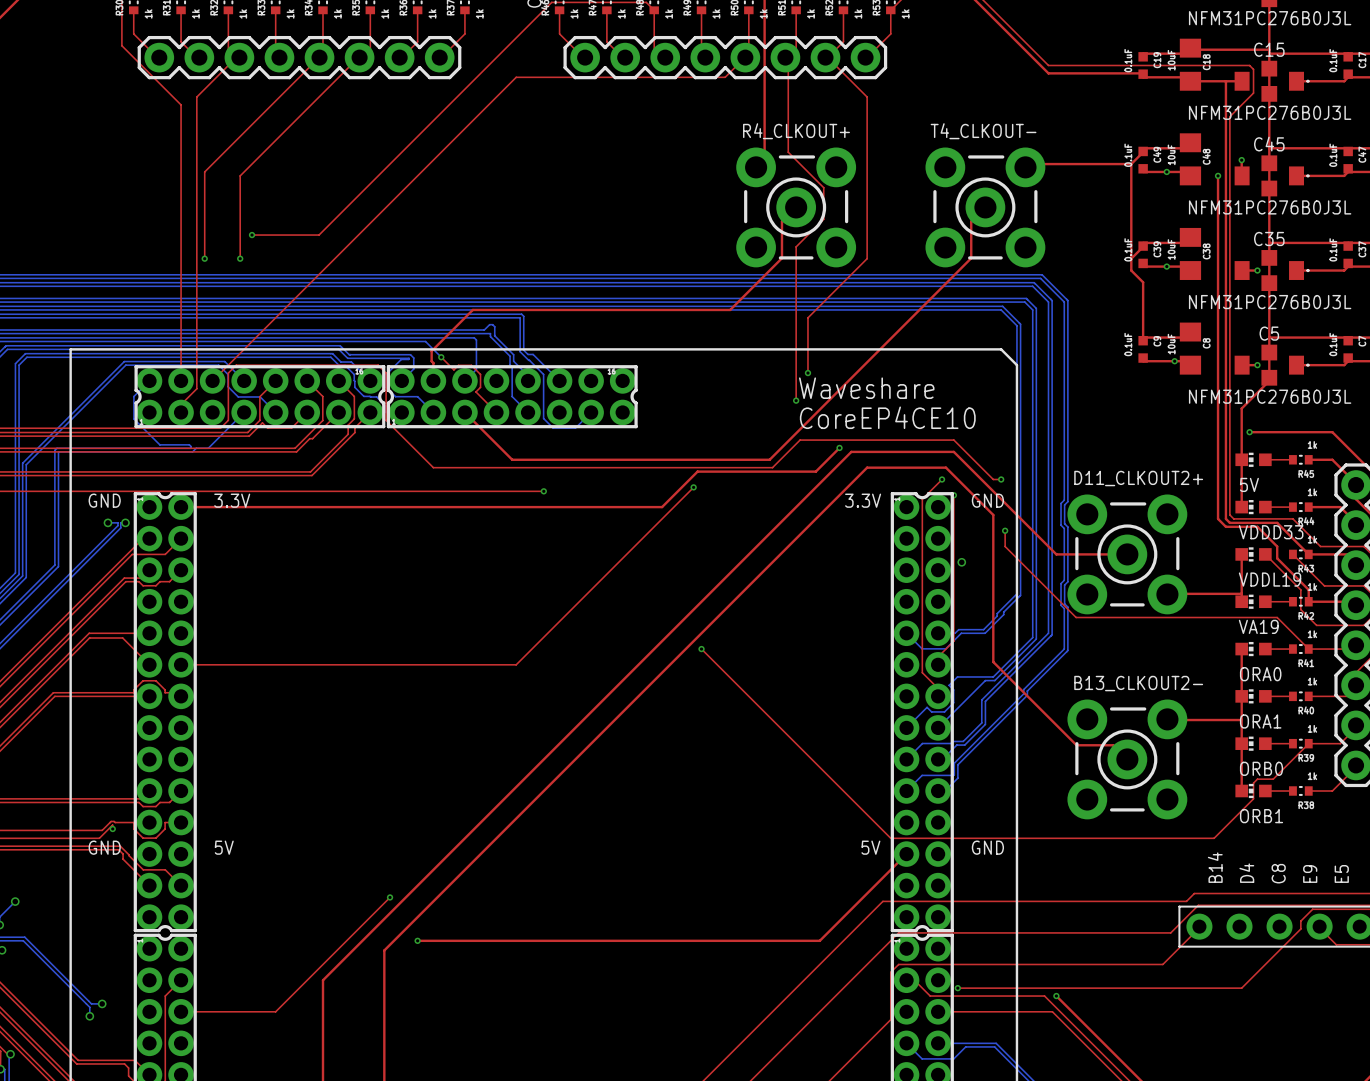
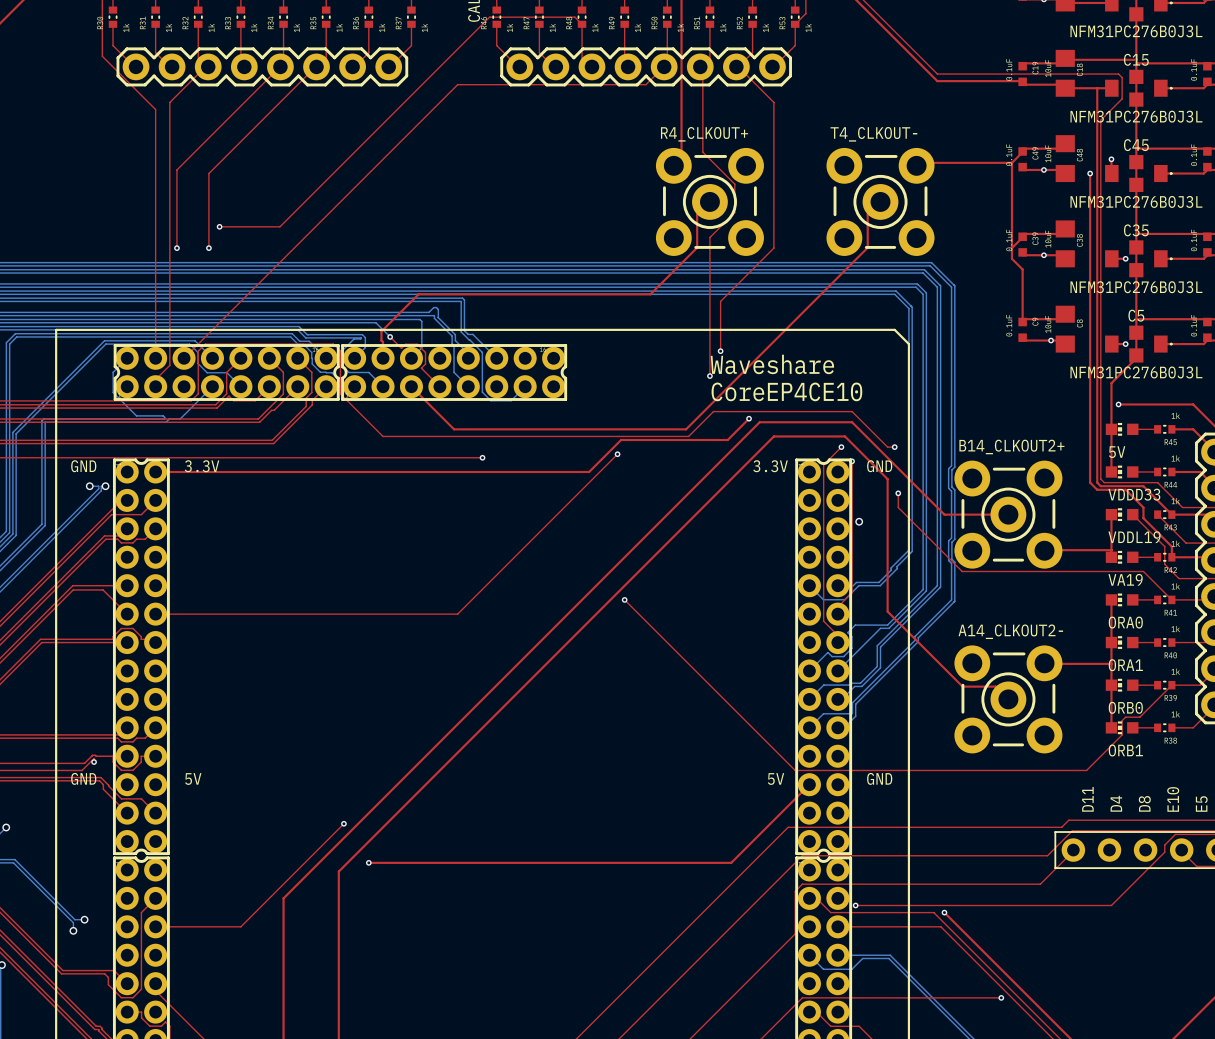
D11_CLKOUT2+ name: D11_CLKOUT2+ (1138, 478) -> B14_CLKOUT2+ (1011, 446)
B13_CLKOUT2- name: B13_CLKOUT2- (1138, 683) -> A14_CLKOUT2- (1010, 631)
text: B14 (1215, 867) -> D11 (1087, 799)
text: C8 (1278, 873) -> D8 (1144, 803)
text: E9 (1310, 873) -> E10 (1173, 799)

